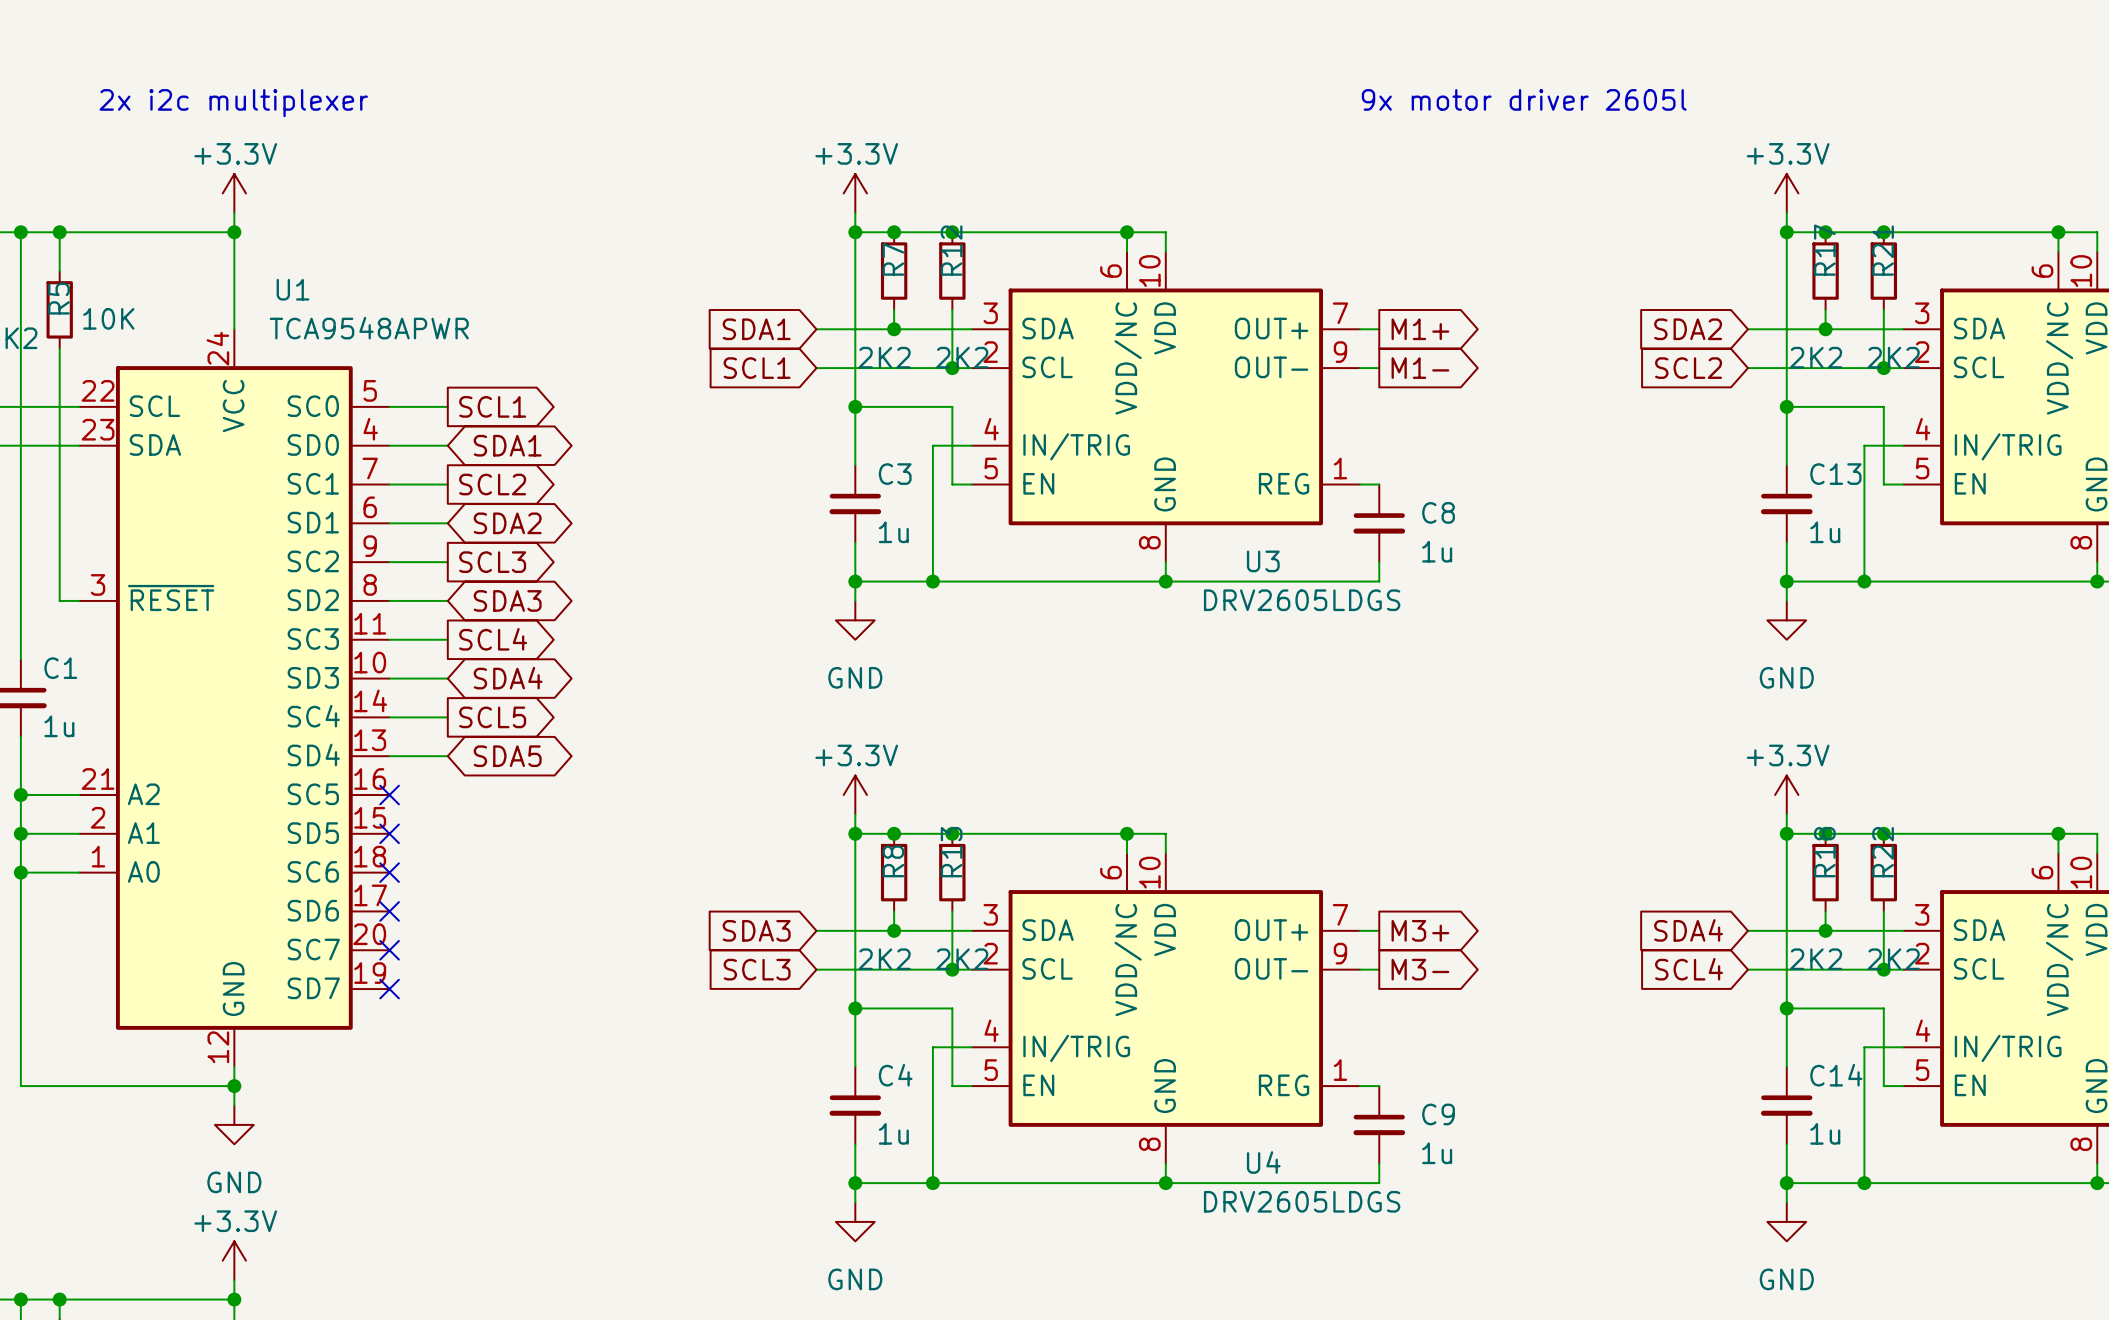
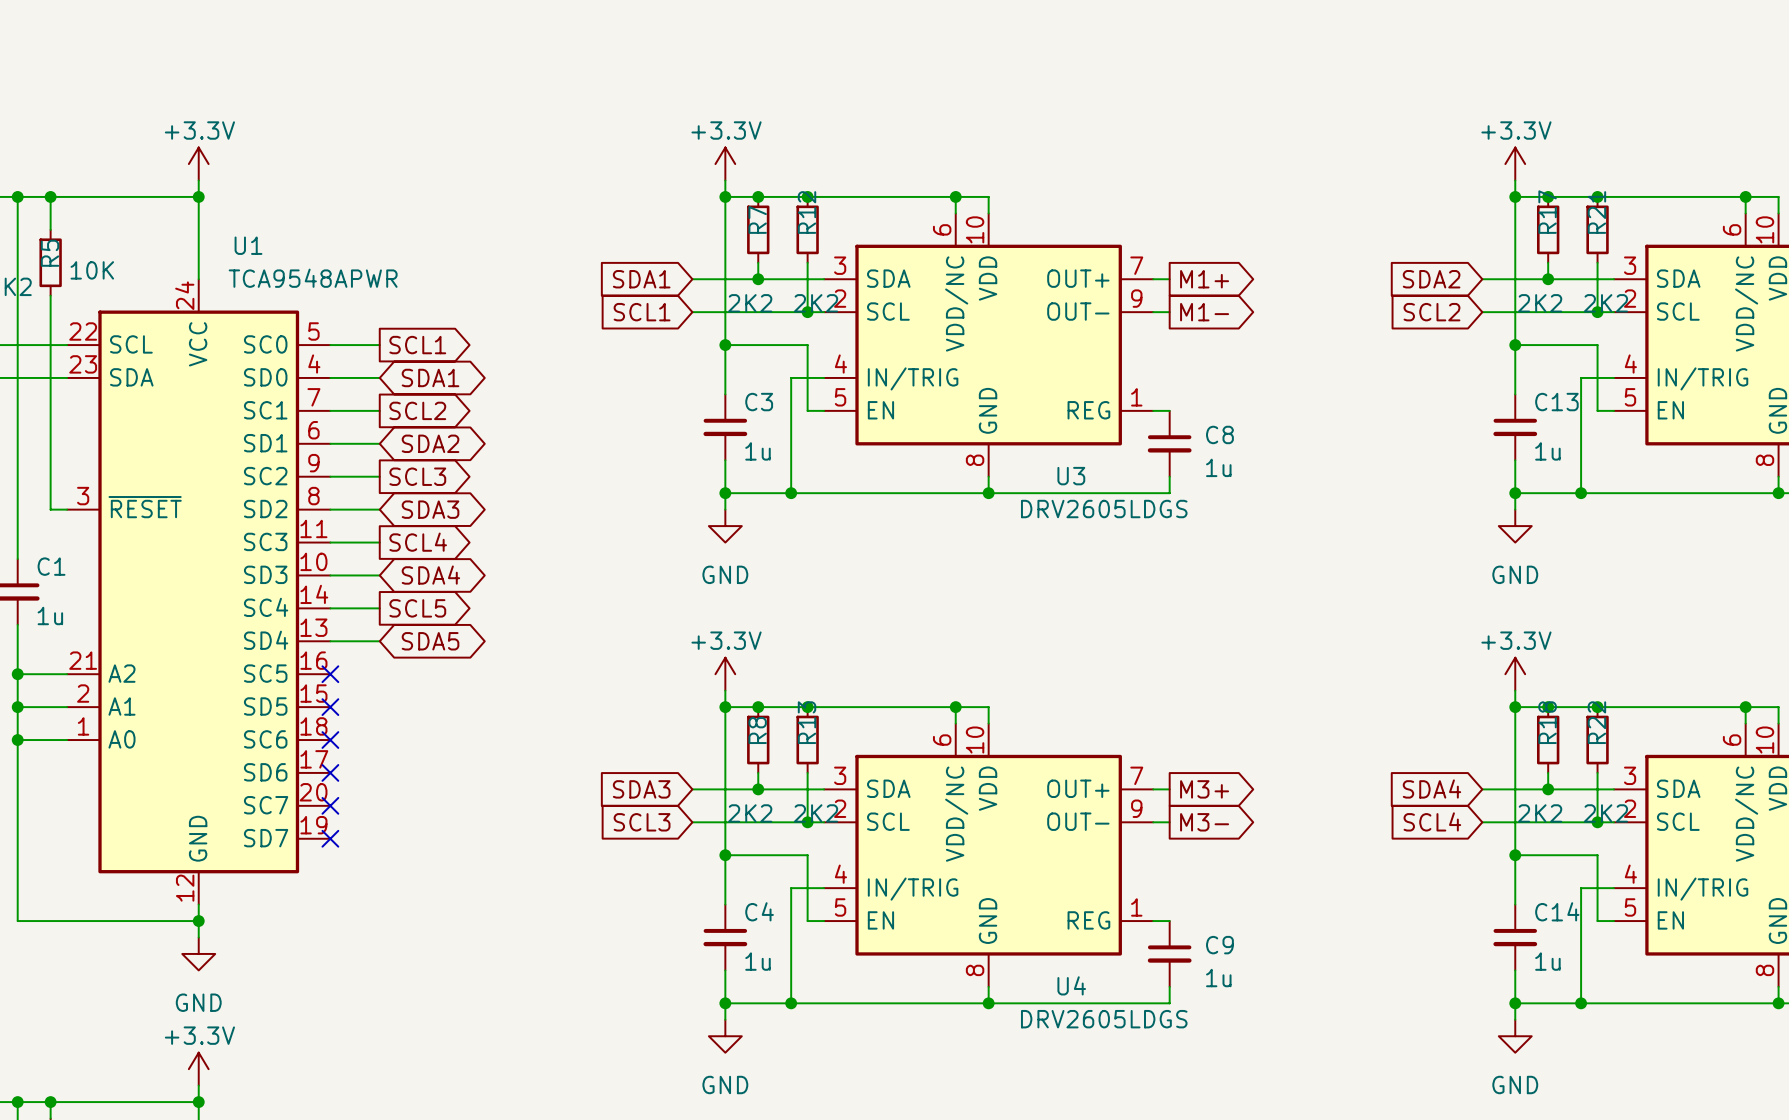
text: 9x motor driver 2605l (1524, 99) -> none
text: 2x i2c multiplexer (233, 103) -> none

